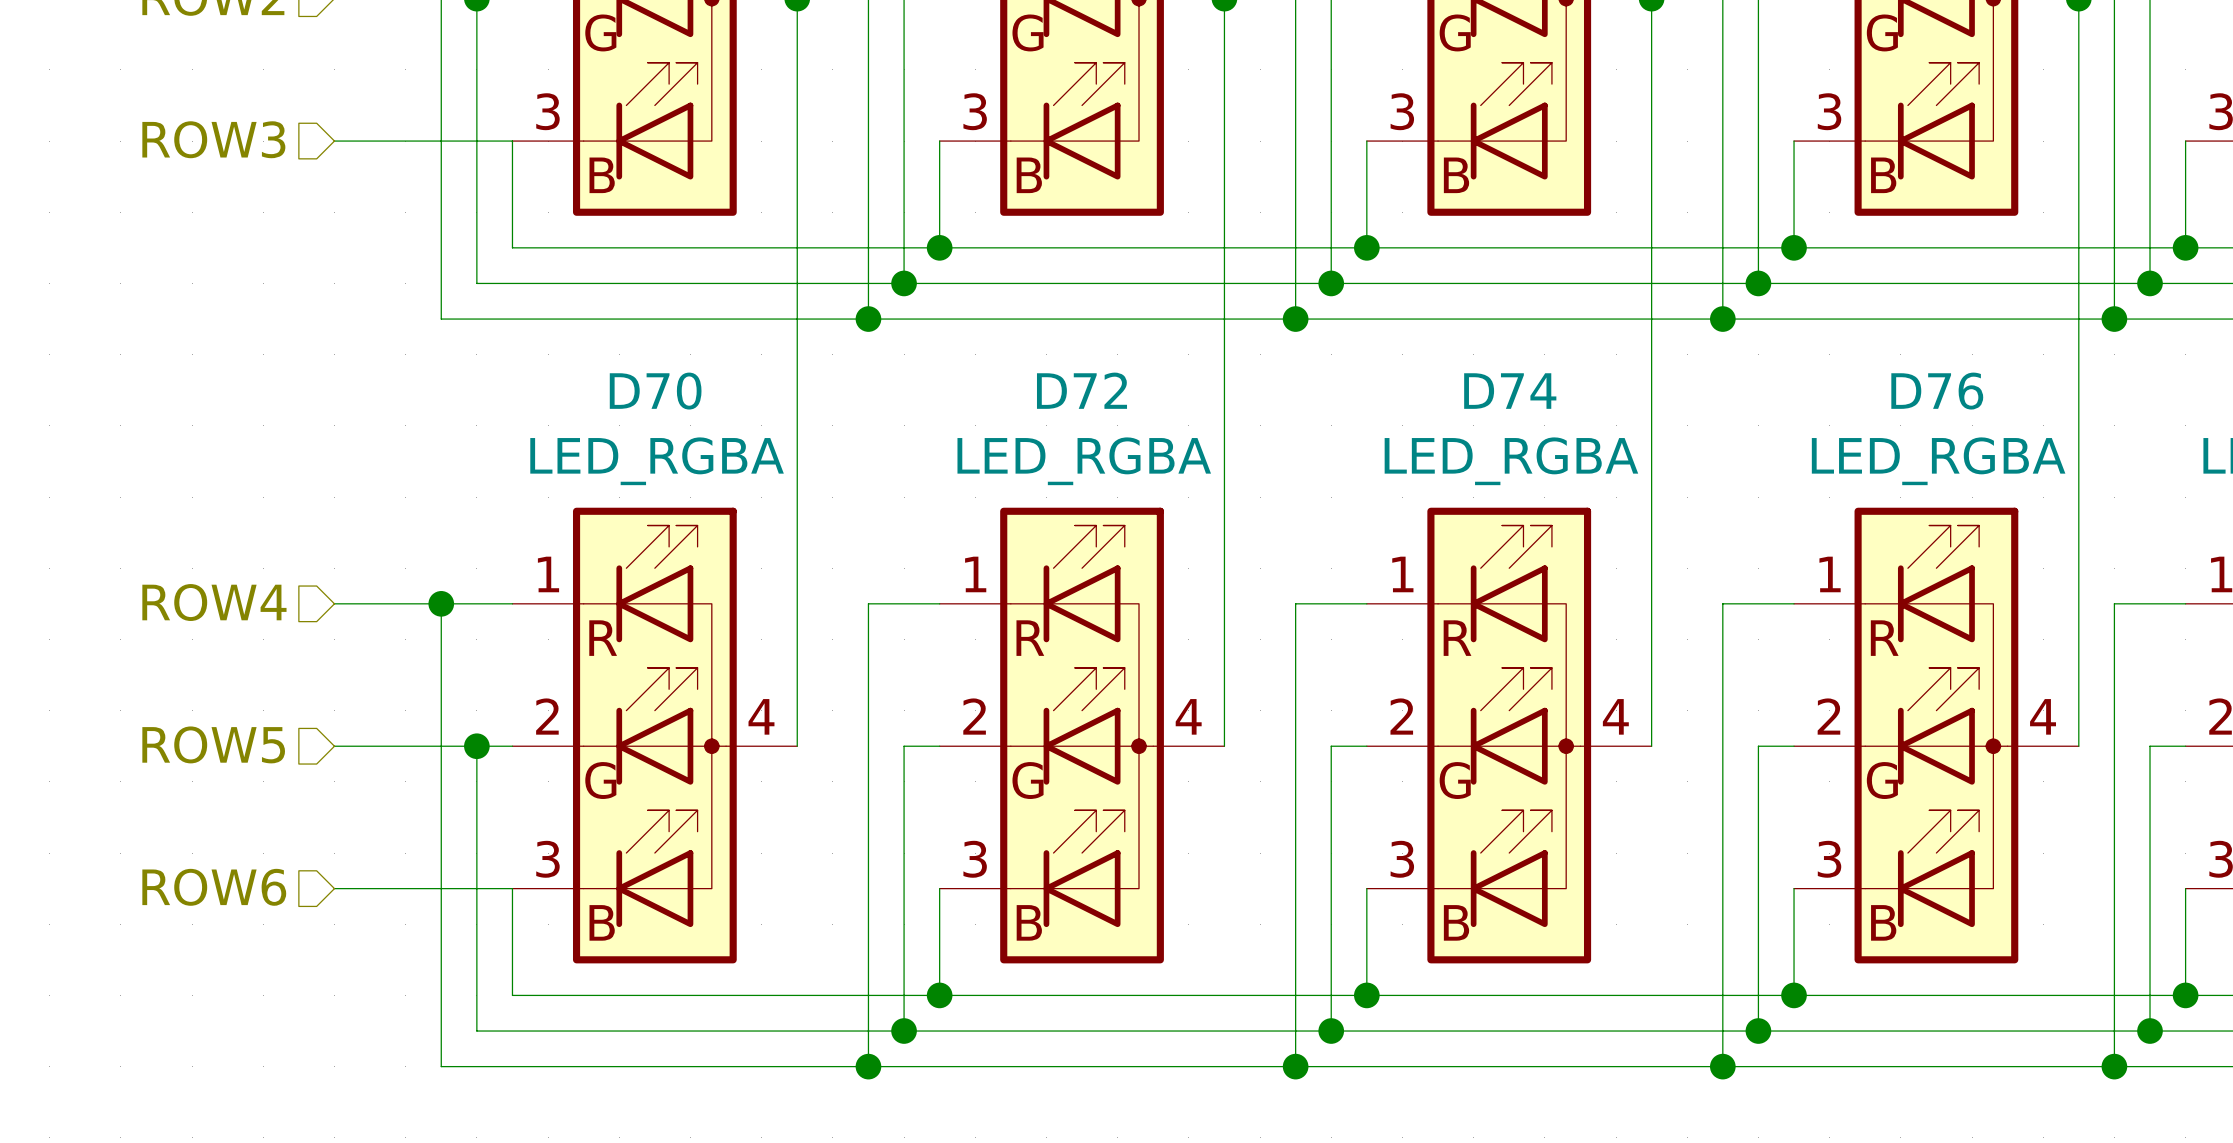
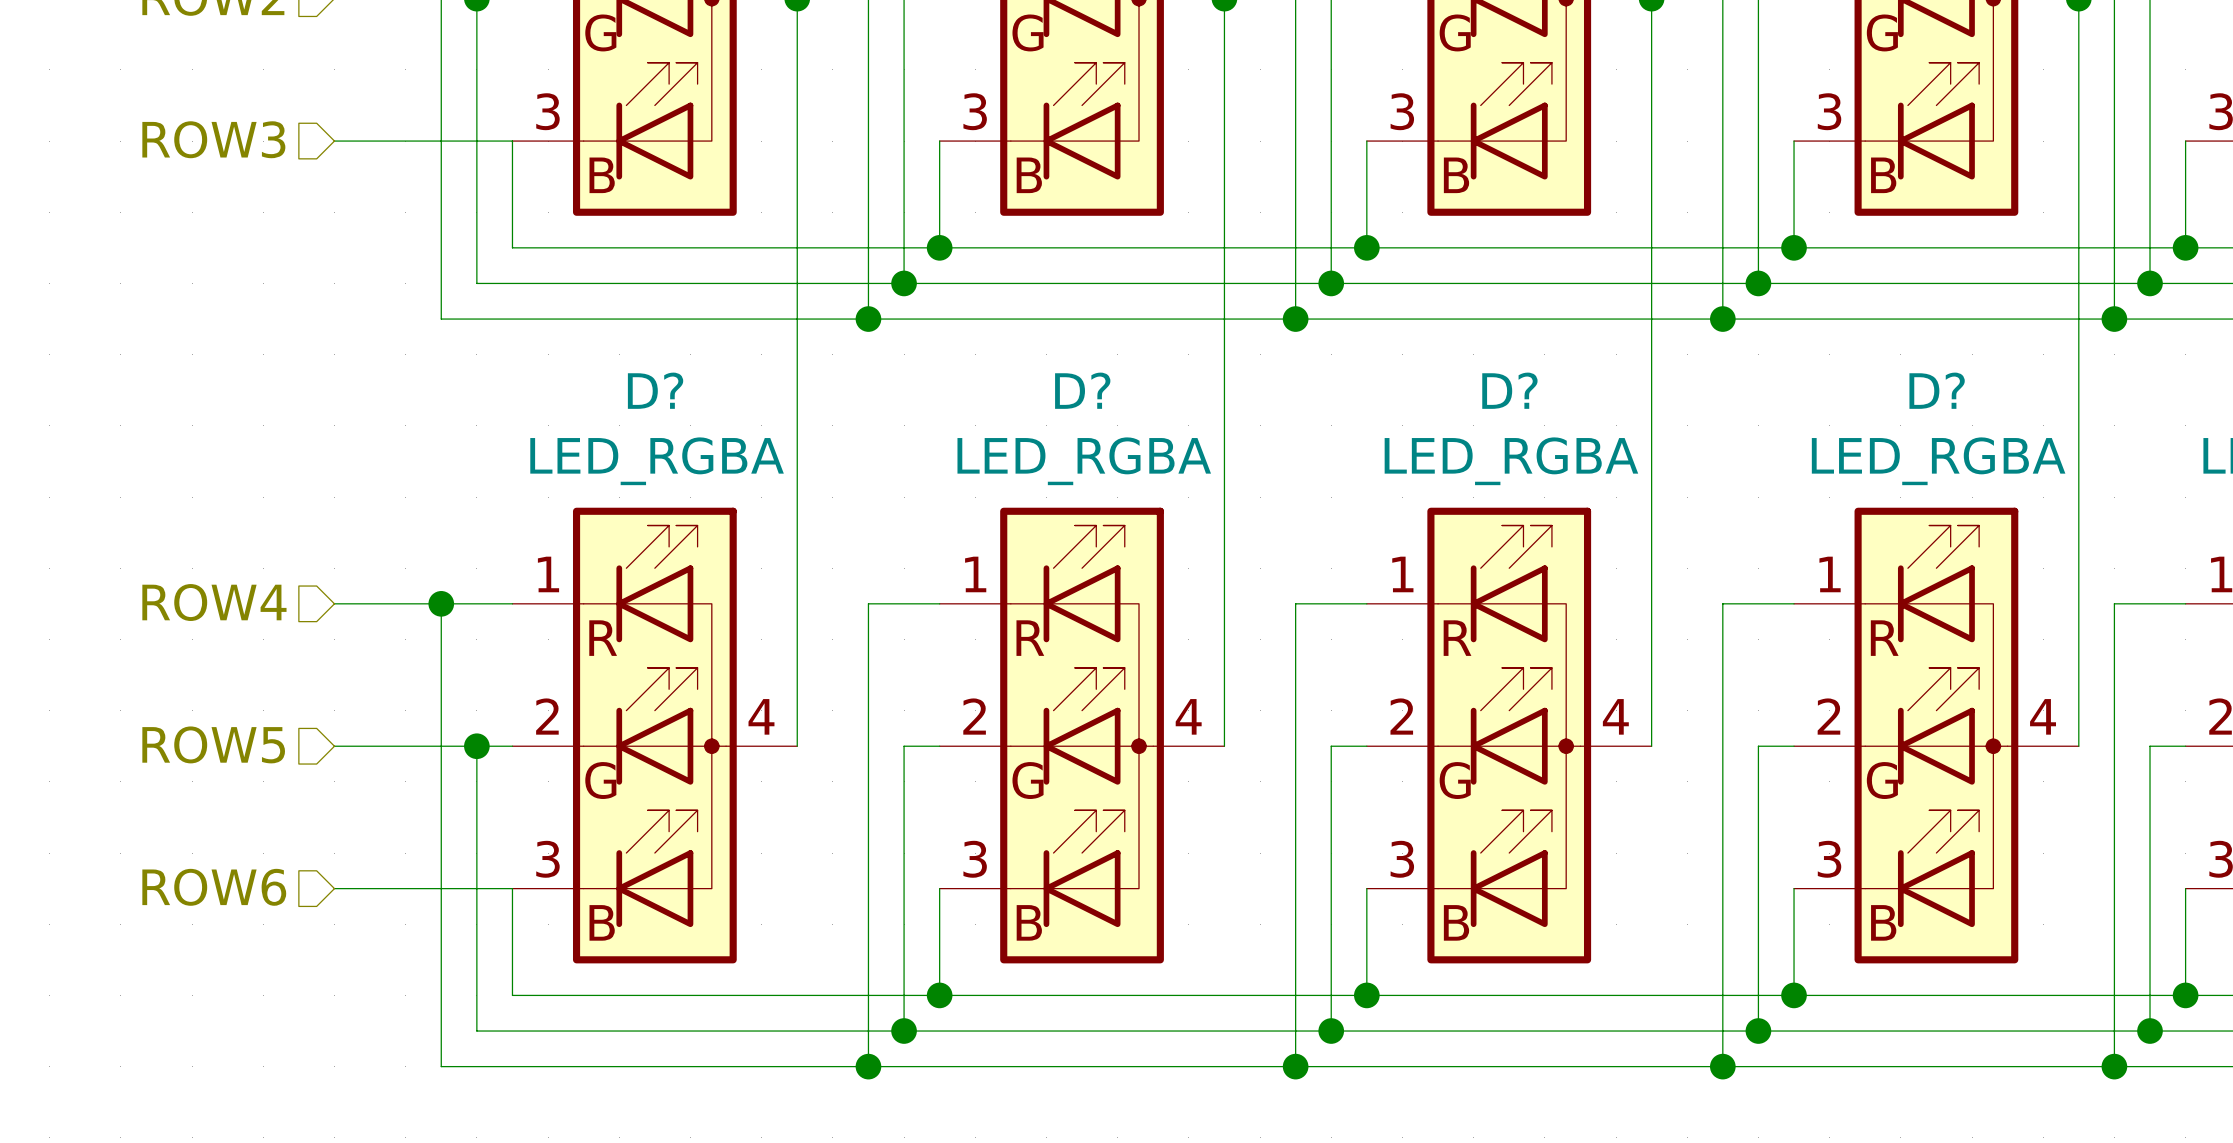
D72 name: D72 (1081, 390) -> D? (1082, 390)
D70 name: D70 (655, 391) -> D? (655, 390)
D74 name: D74 (1510, 391) -> D? (1509, 390)
D76 name: D76 (1937, 391) -> D? (1937, 390)

